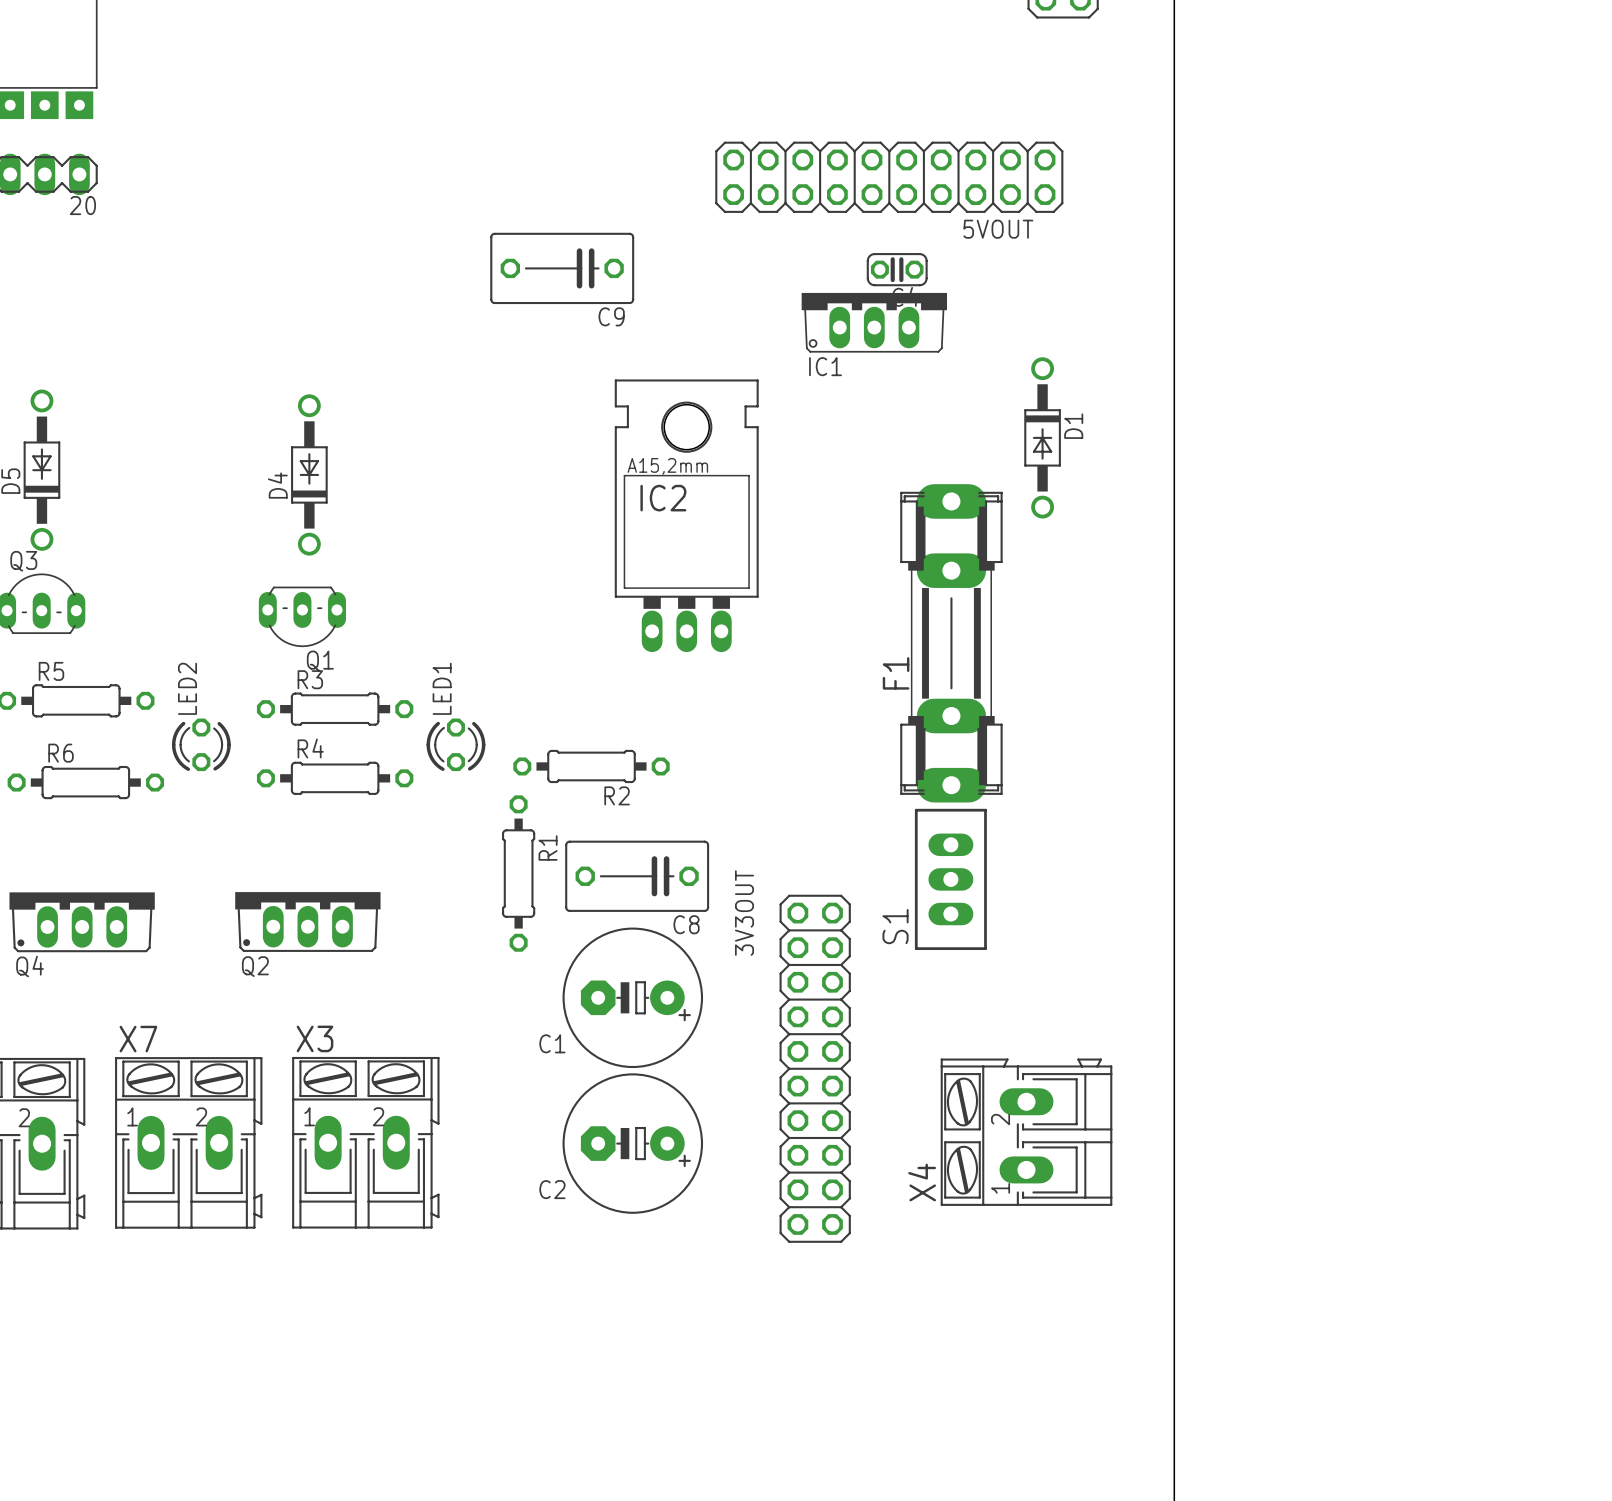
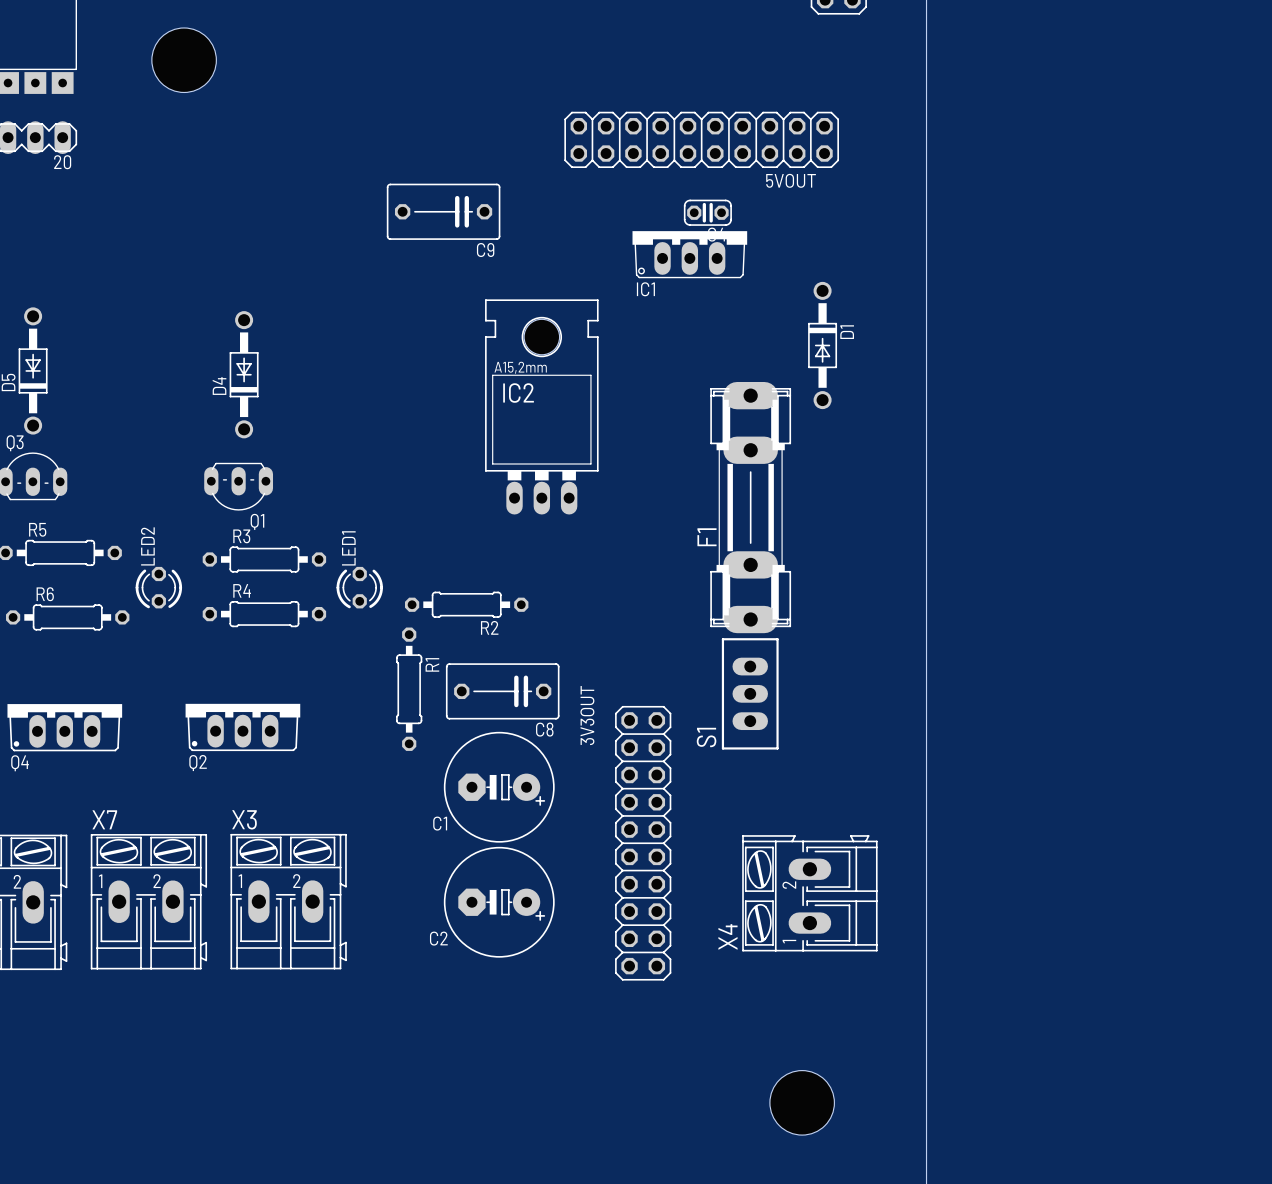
hole: none -> (184, 60)
hole: none -> (802, 1102)

